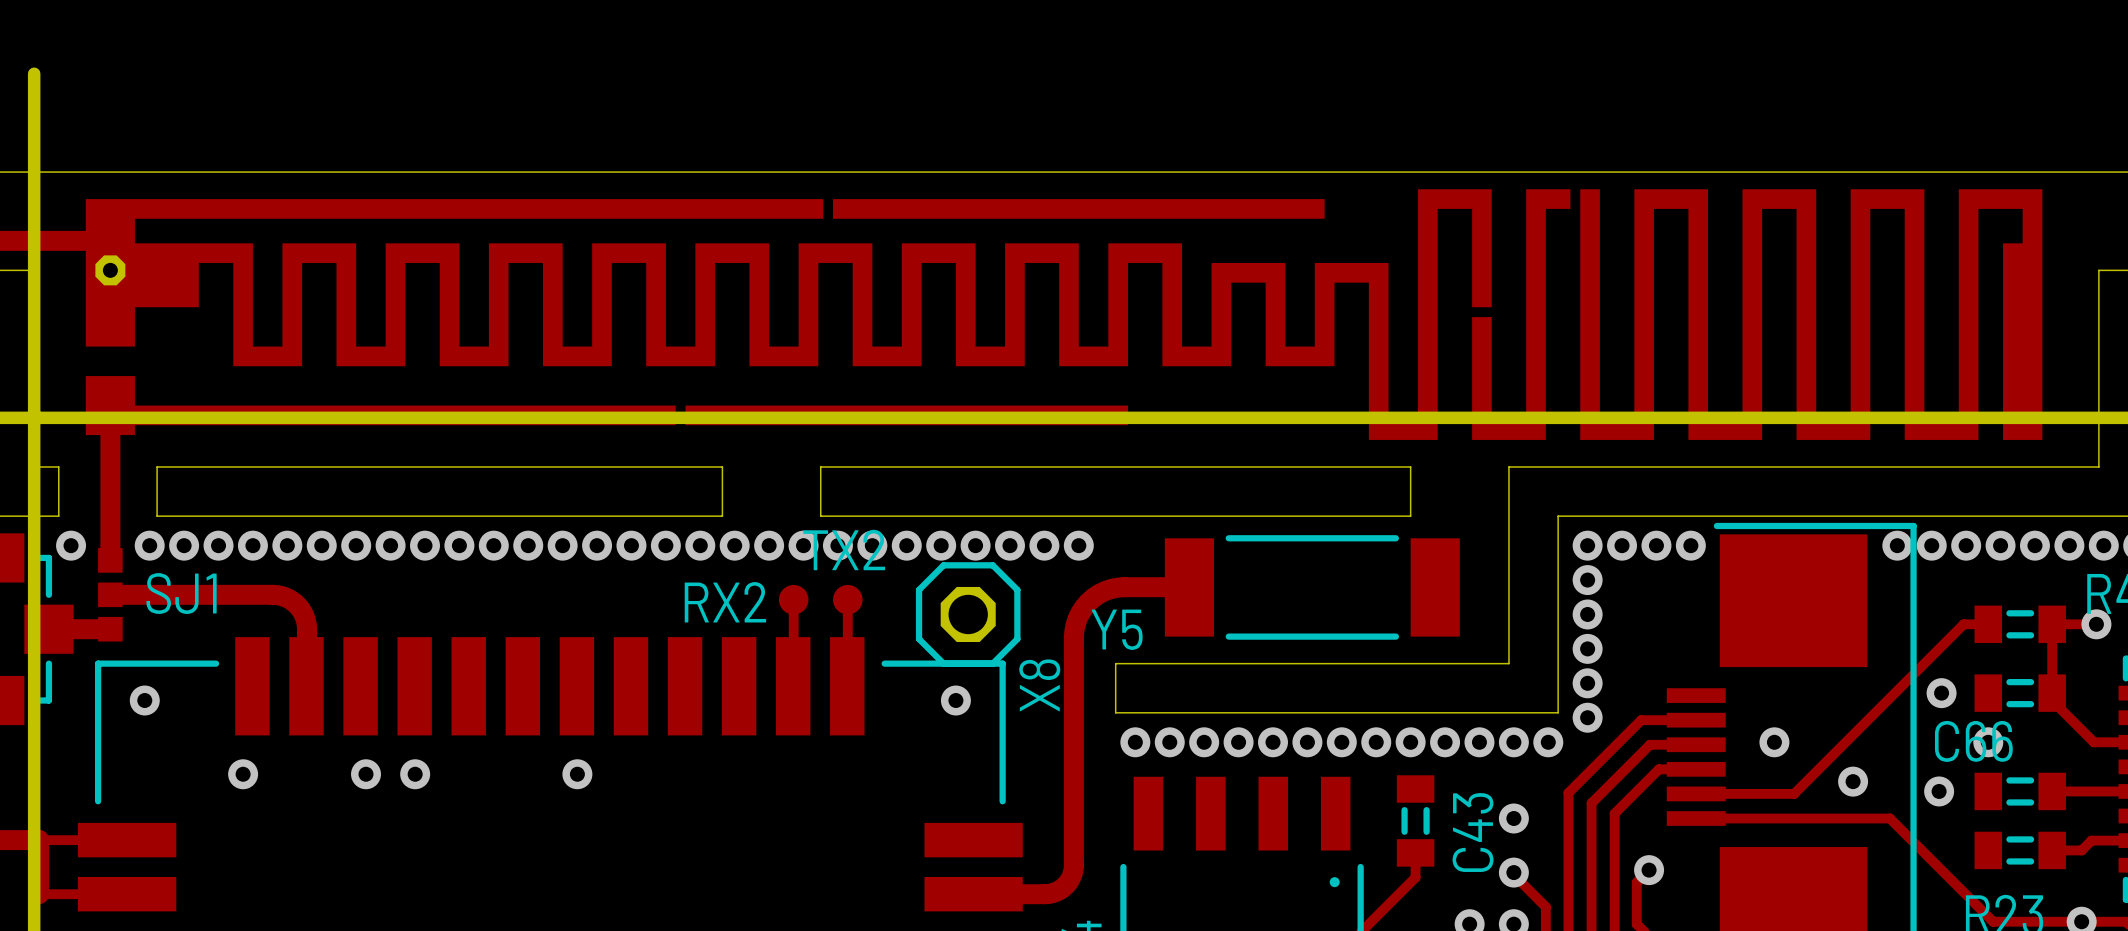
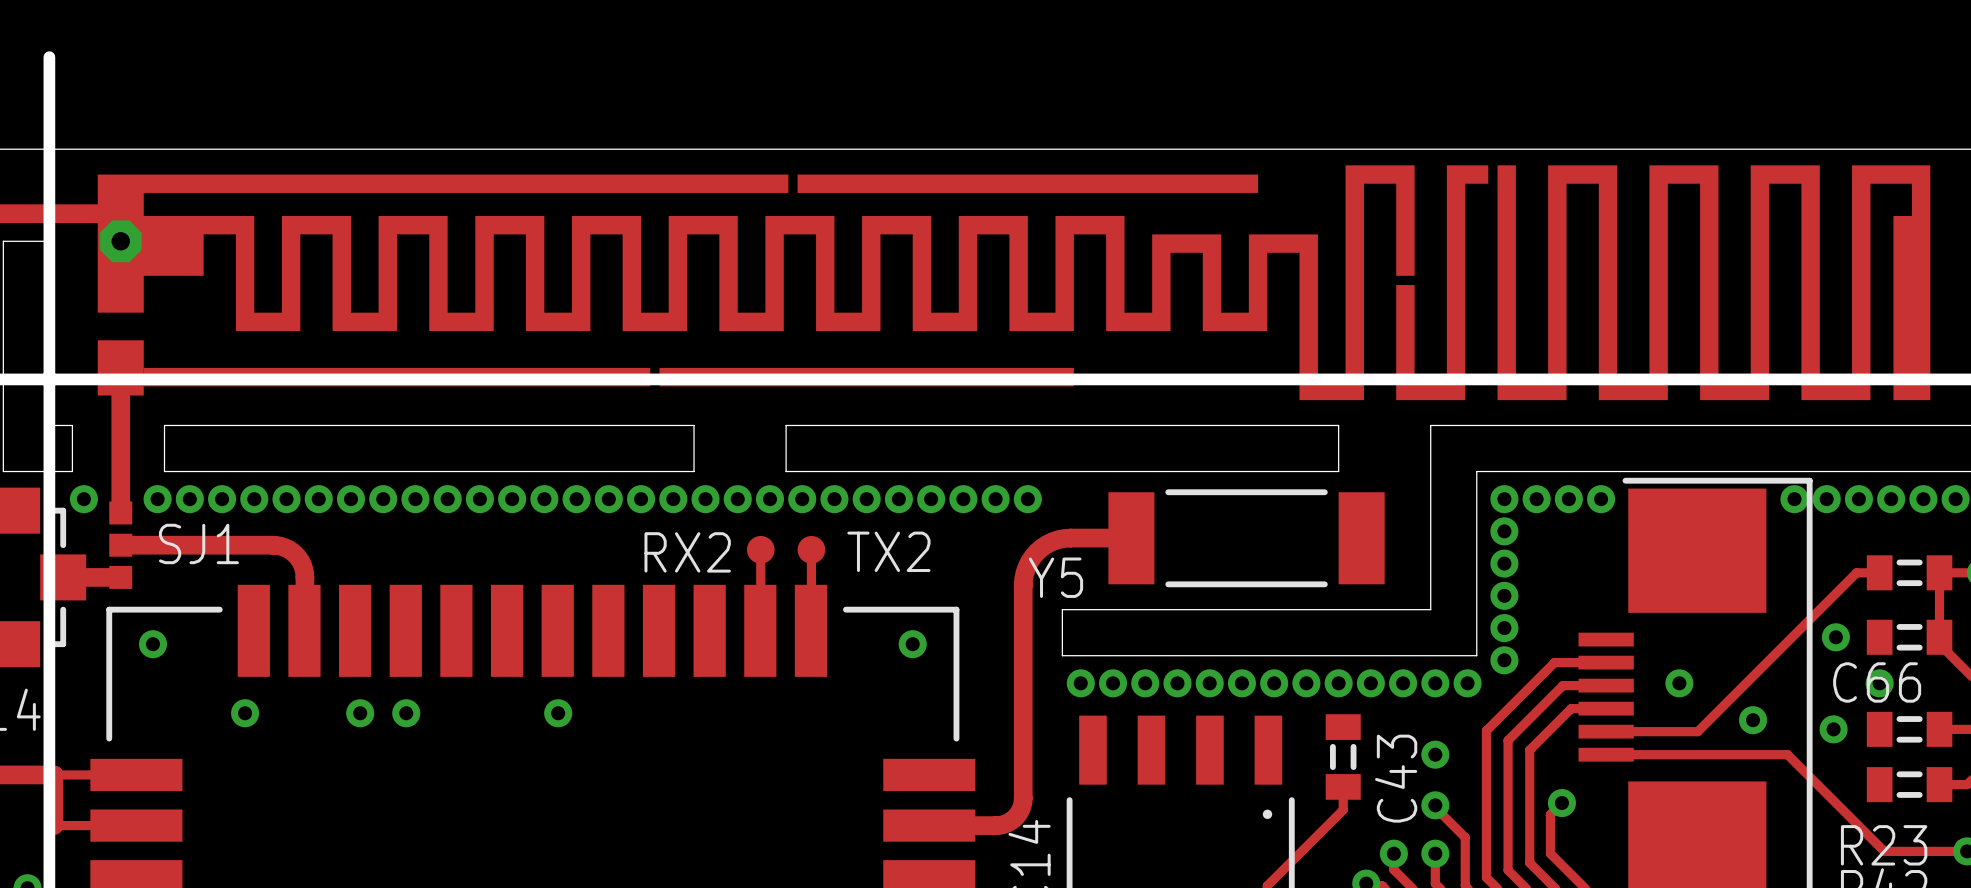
part footprint: [85, 189, 2043, 440] -> [97, 165, 1931, 401]
part value position: TX2 (844, 550) -> TX2 (888, 551)
X8: (968, 614) -> none

